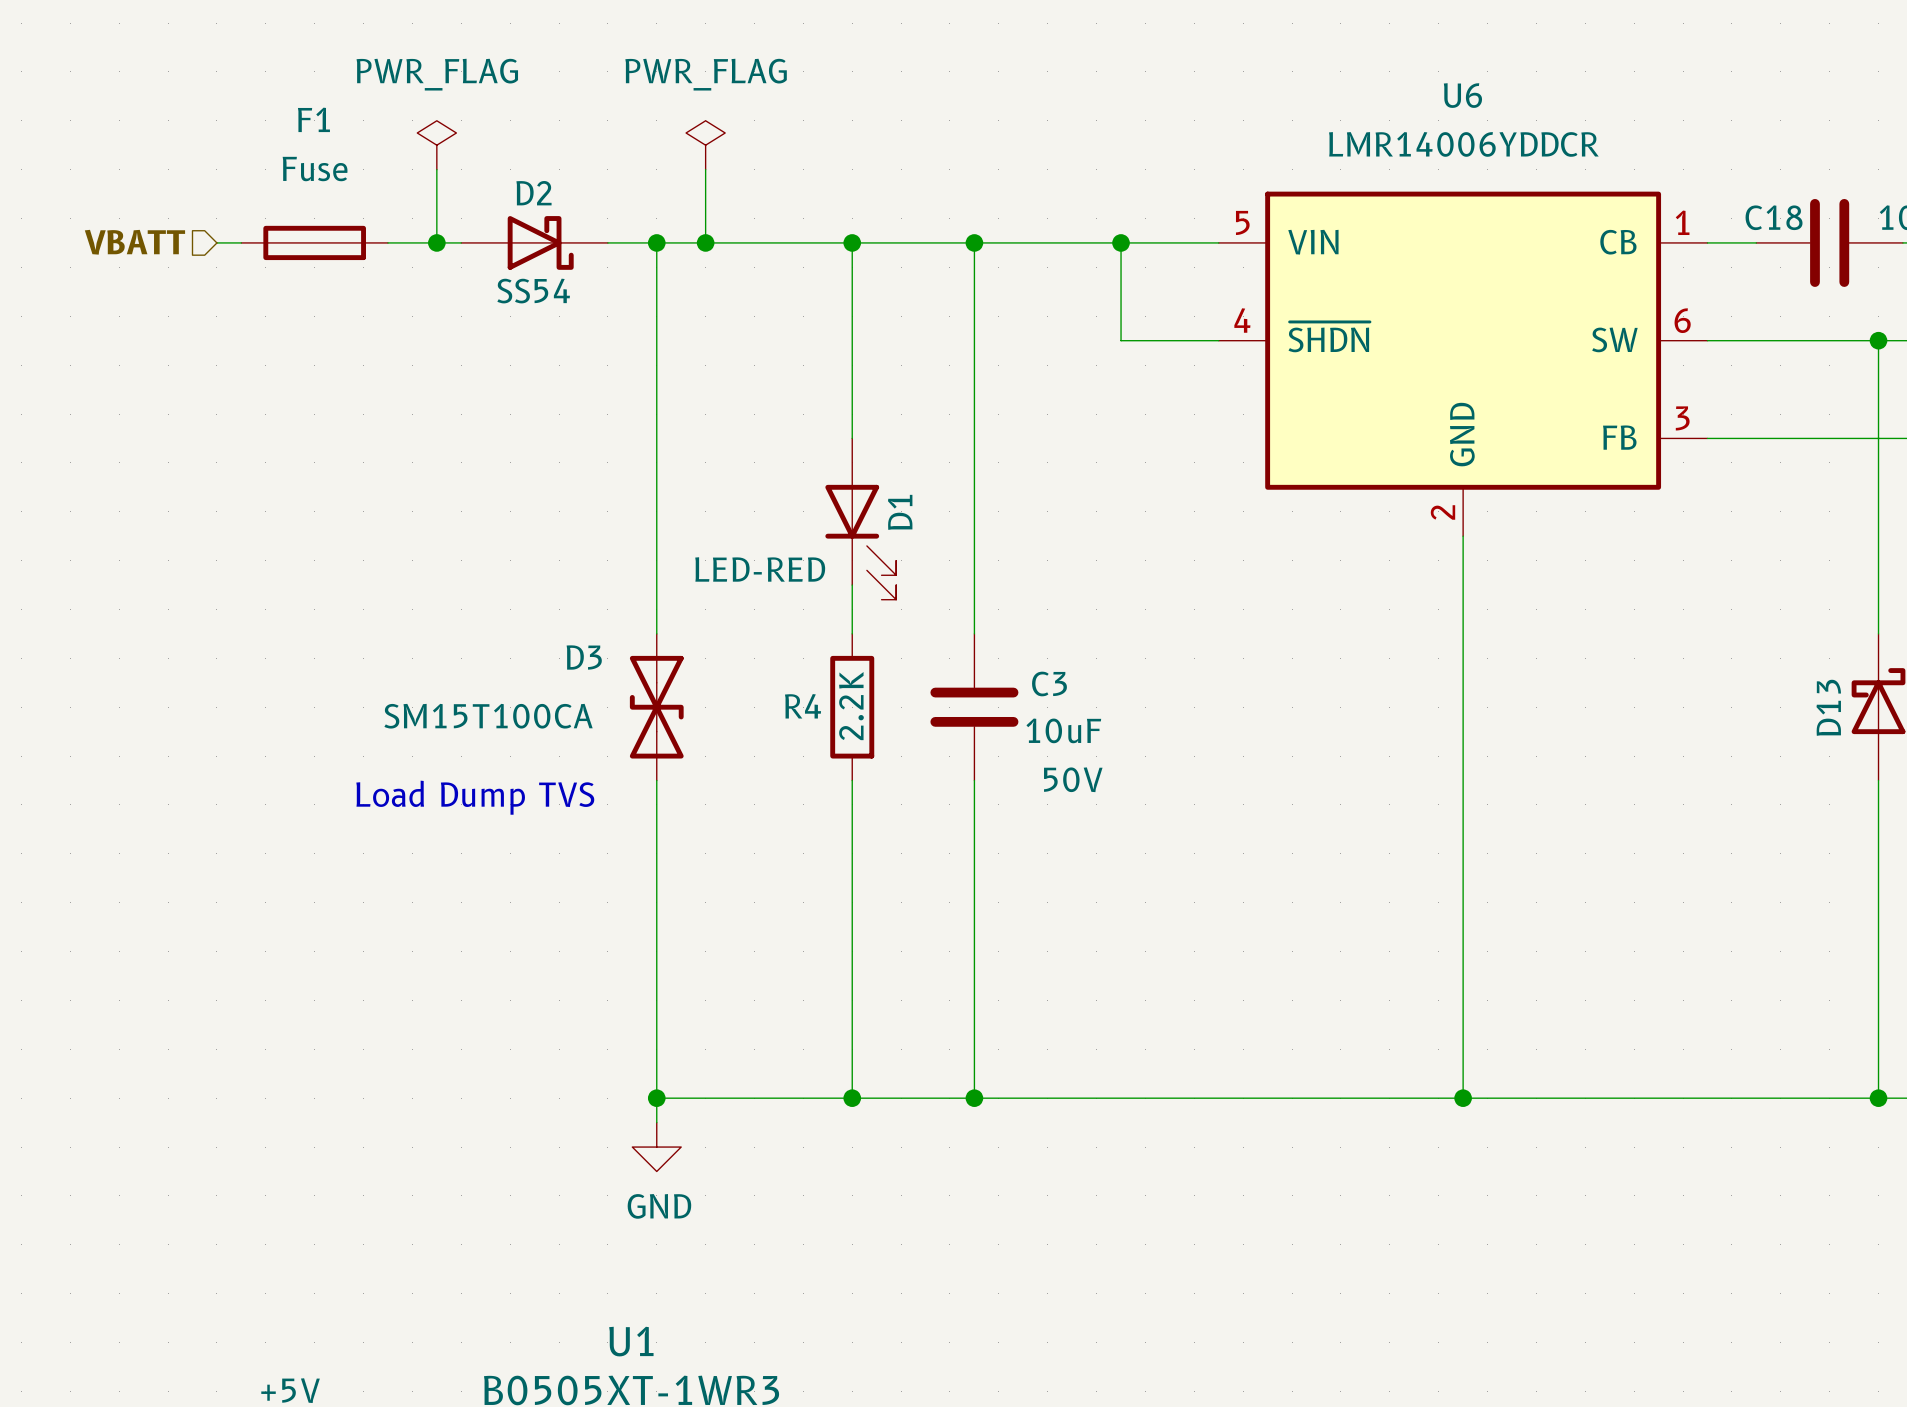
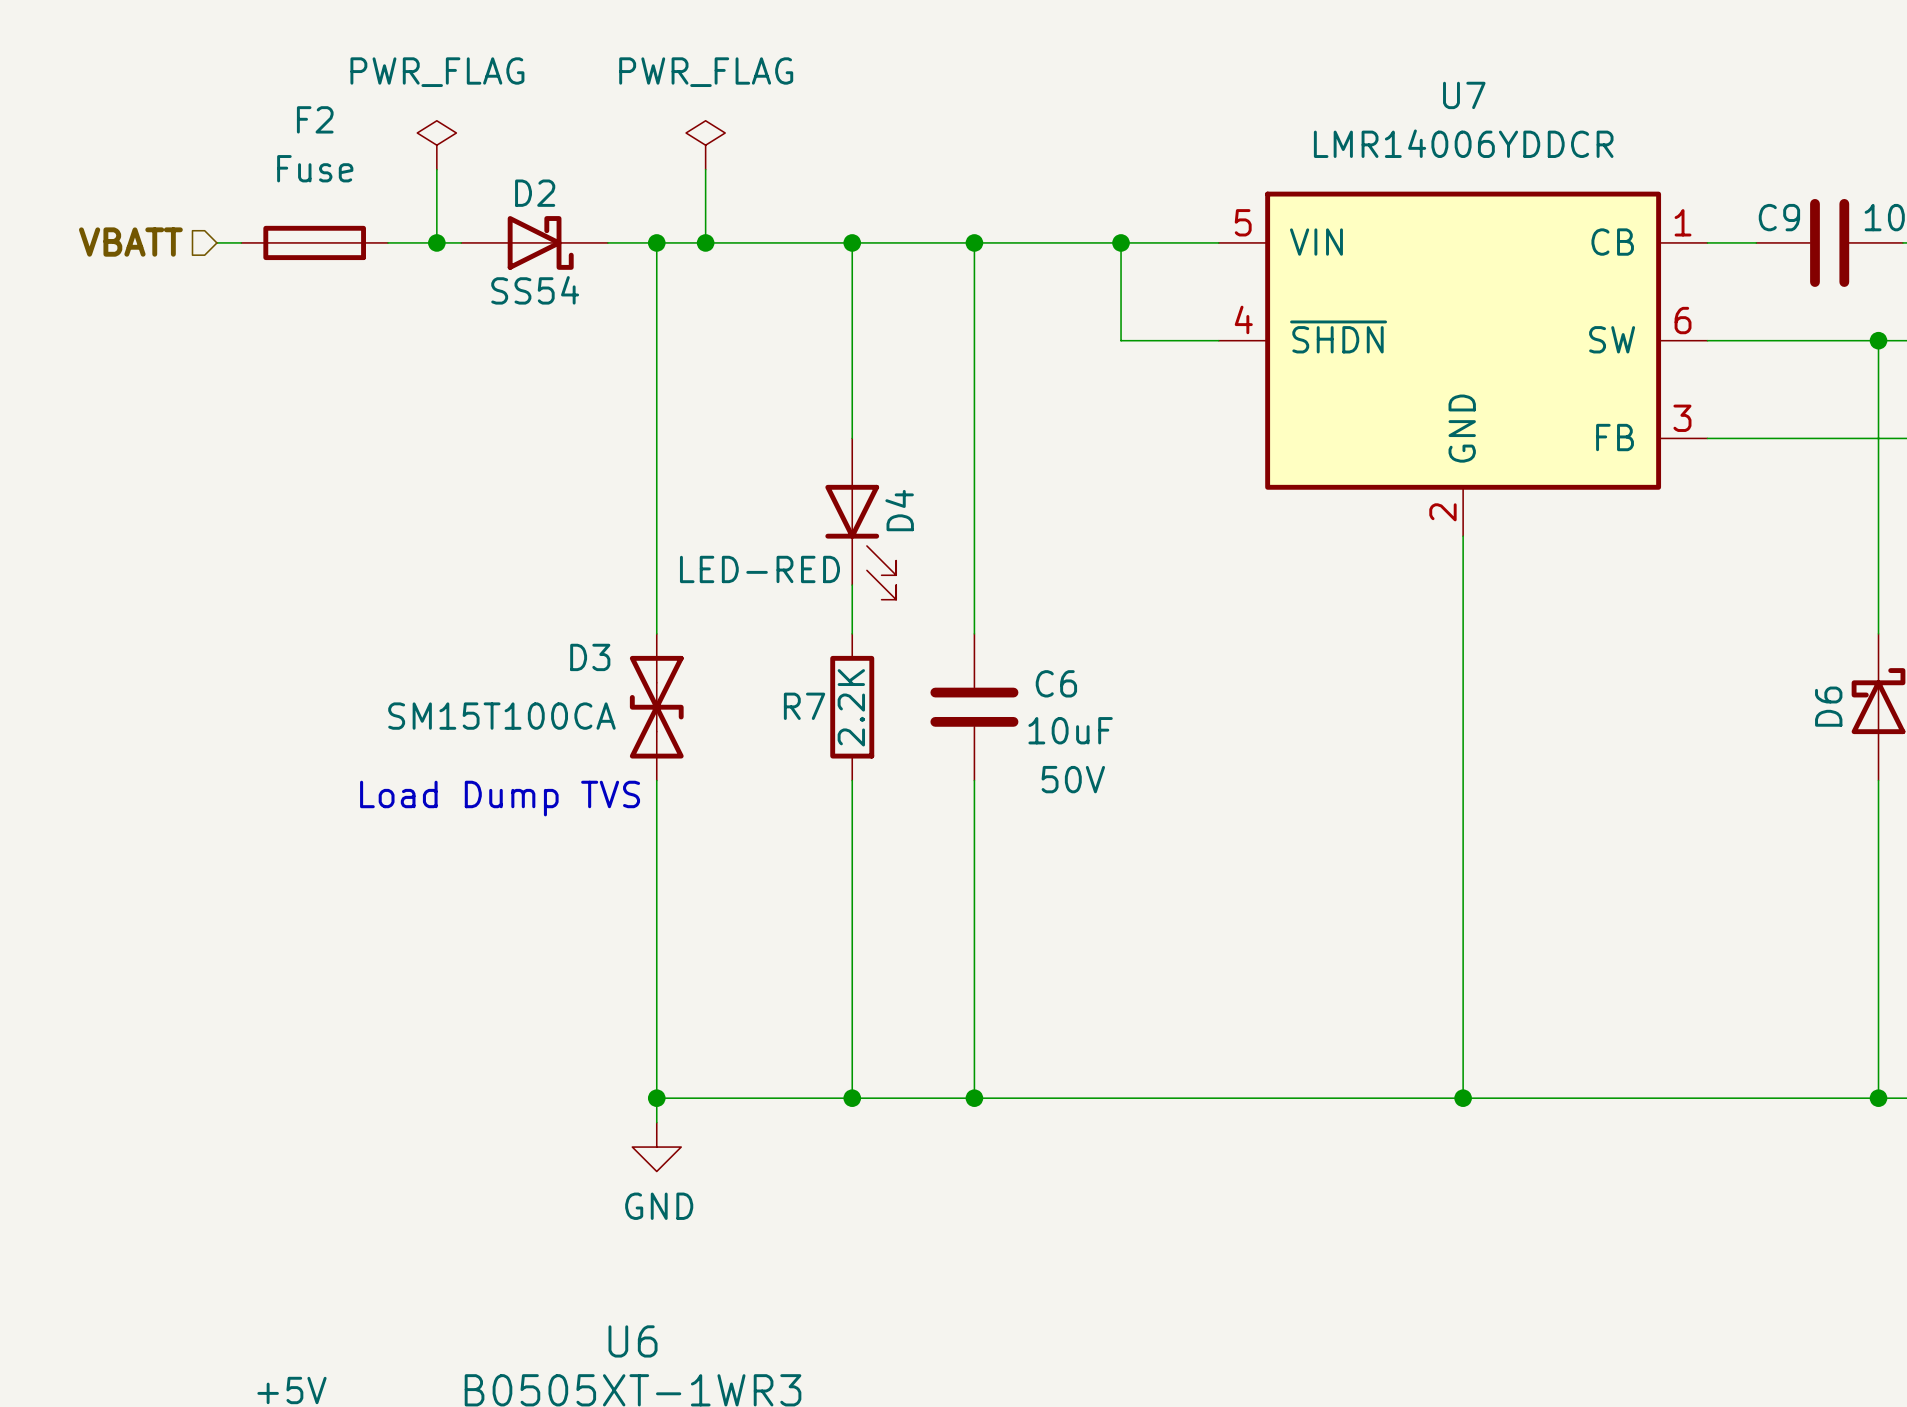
U6 name: U6 (1462, 95) -> U7 (1464, 95)
F1 name: F1 (313, 119) -> F2 (315, 119)
C18 name: C18 (1774, 217) -> C9 (1779, 217)
D1 name: D1 (900, 512) -> D4 (899, 510)
C3 name: C3 (1049, 683) -> C6 (1056, 683)
R4 name: R4 (803, 706) -> R7 (804, 706)
D13 name: D13 (1828, 707) -> D6 (1828, 706)
U1 name: U1 (631, 1341) -> U6 (633, 1341)

